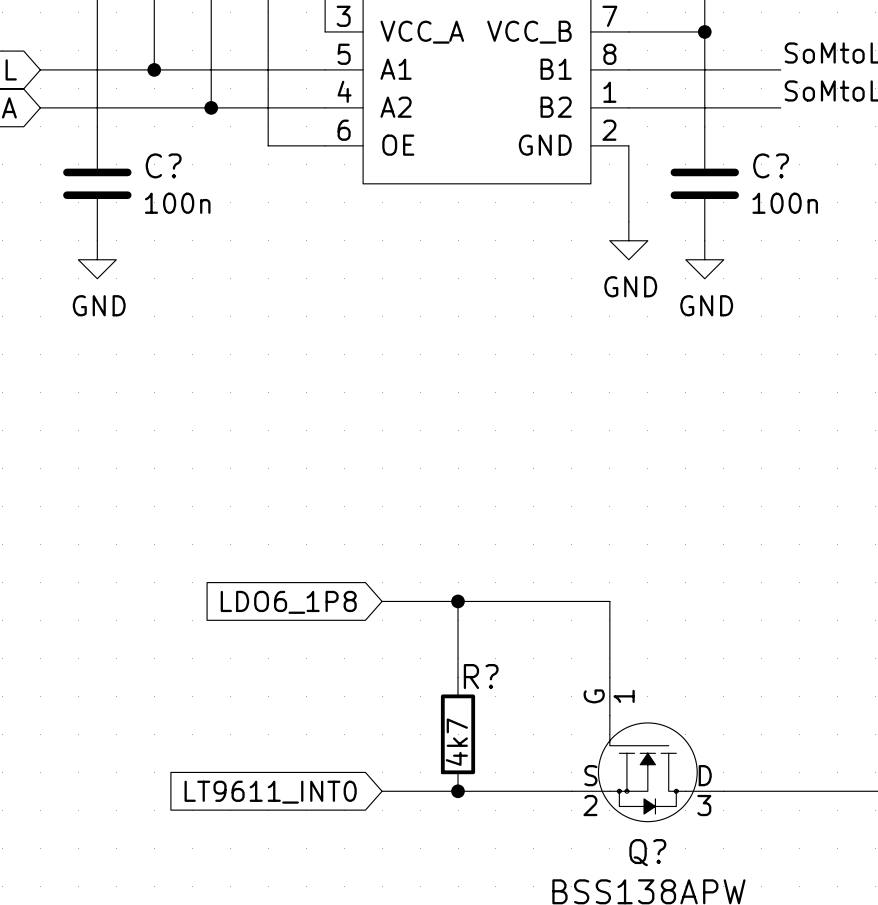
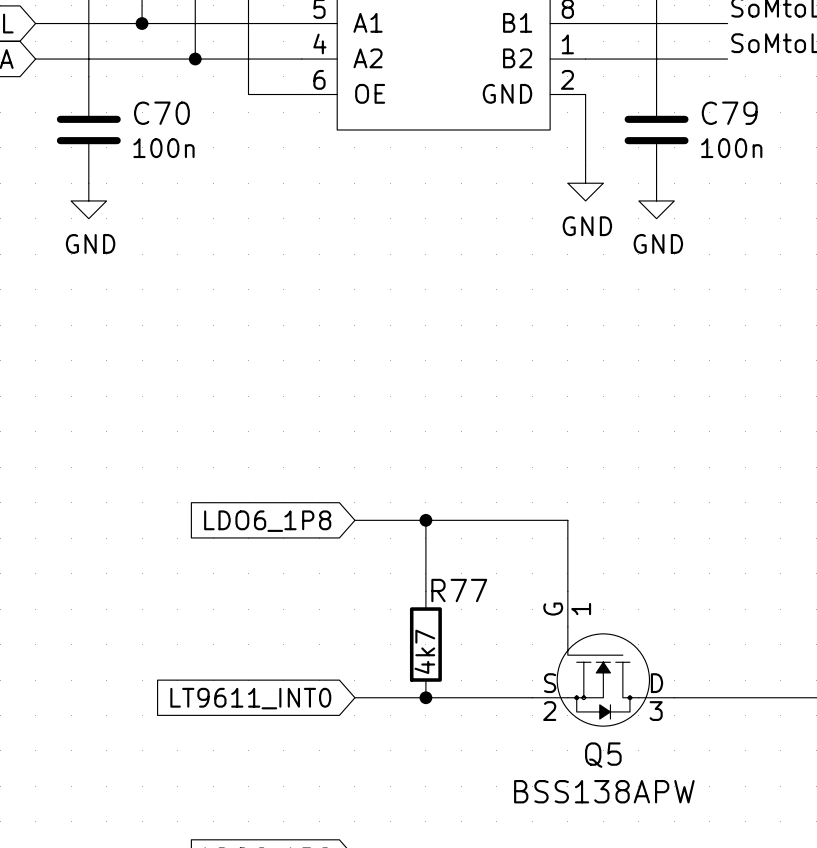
C? name: C? (163, 165) -> C70 (161, 113)
C? name: C? (771, 165) -> C79 (729, 113)
R? name: R? (481, 676) -> R77 (459, 590)
Q? name: Q? (647, 852) -> Q5 (603, 755)

